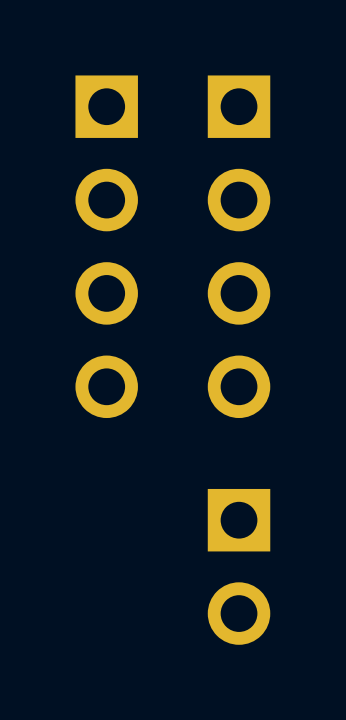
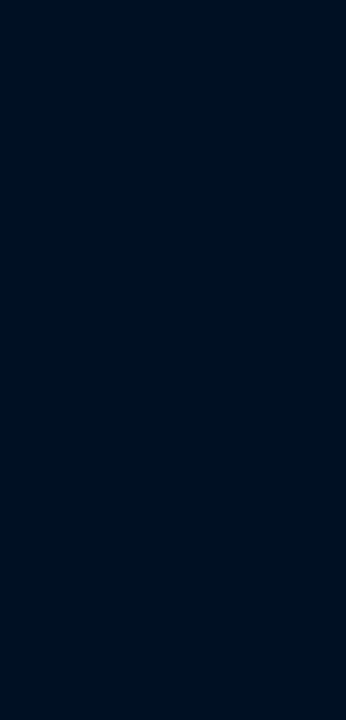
part: (106, 246) -> none
part: (239, 246) -> none
part: (239, 566) -> none

